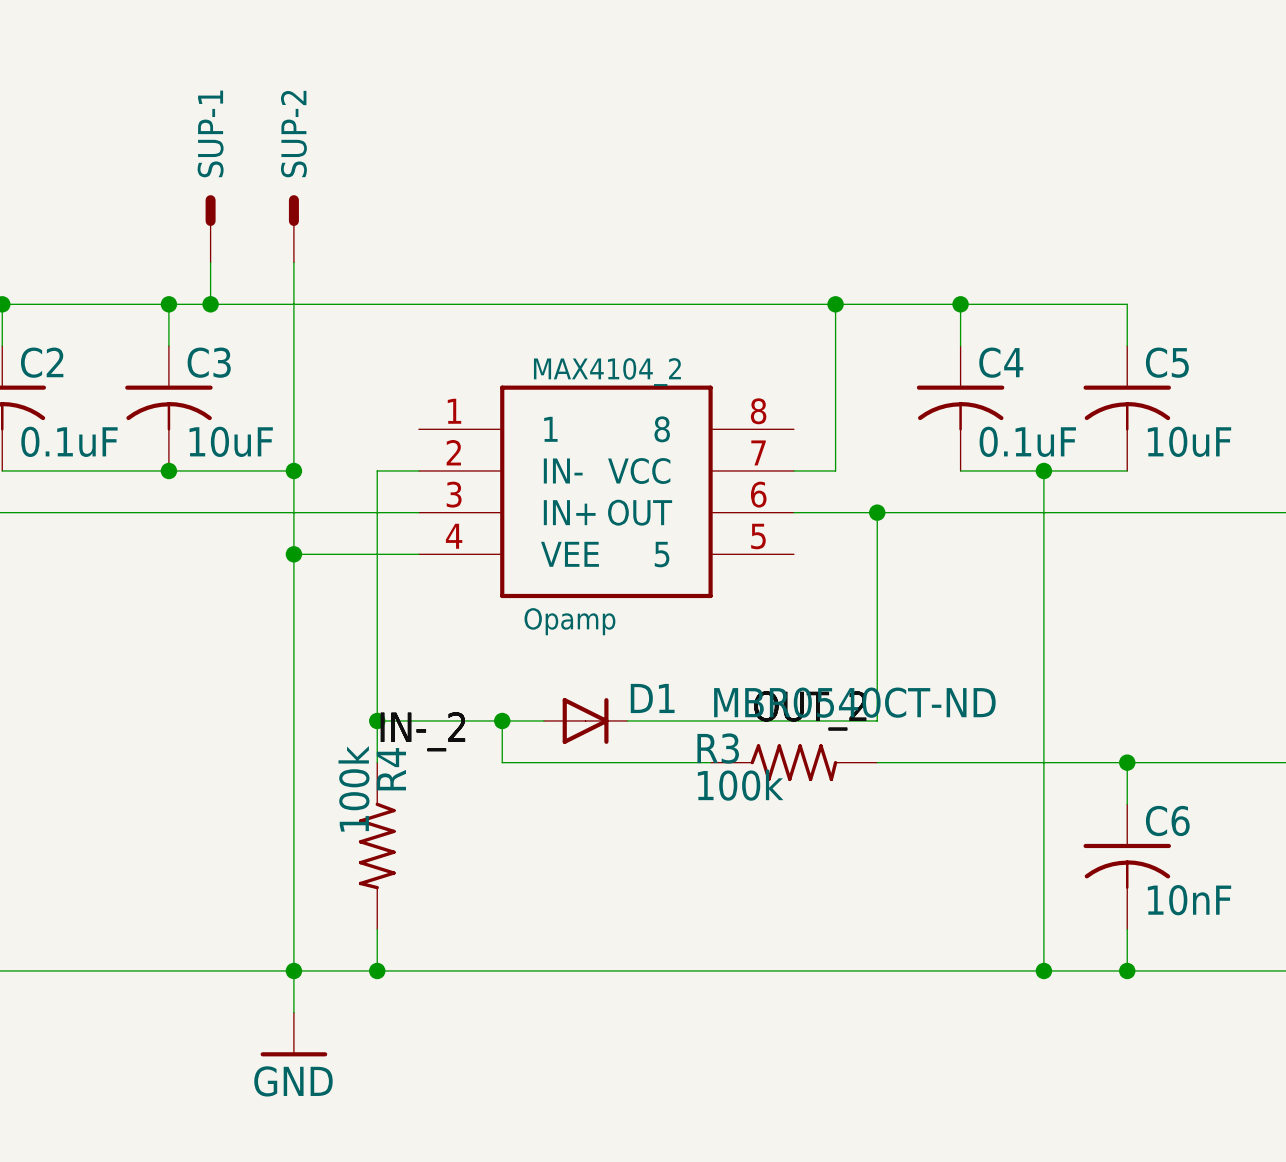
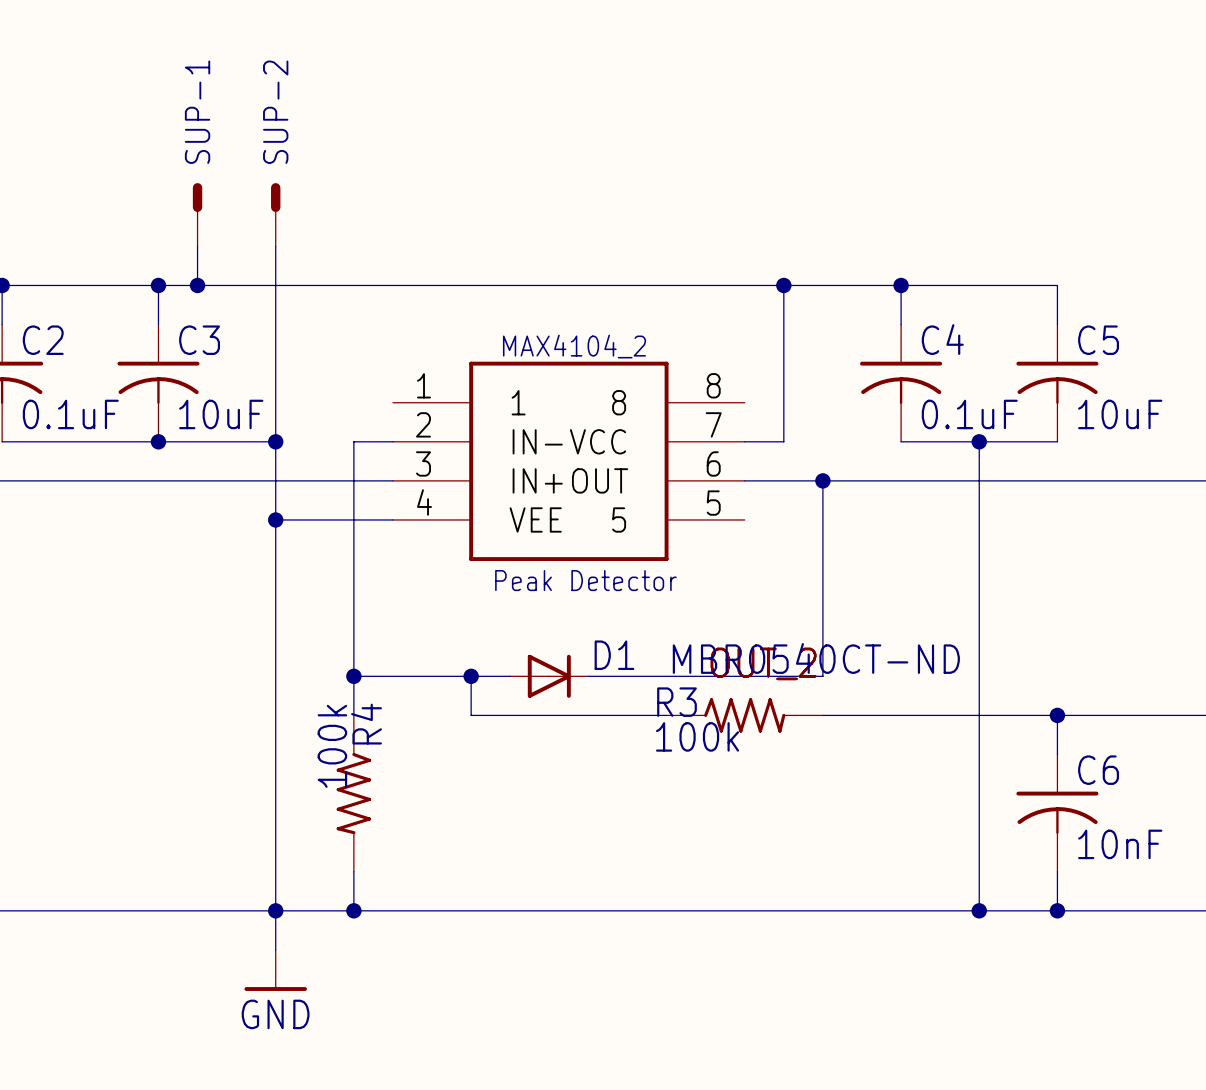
MAX4104_2 value: Opamp (569, 621) -> Peak Detector (585, 580)
label: IN-_2 (422, 731) -> none

